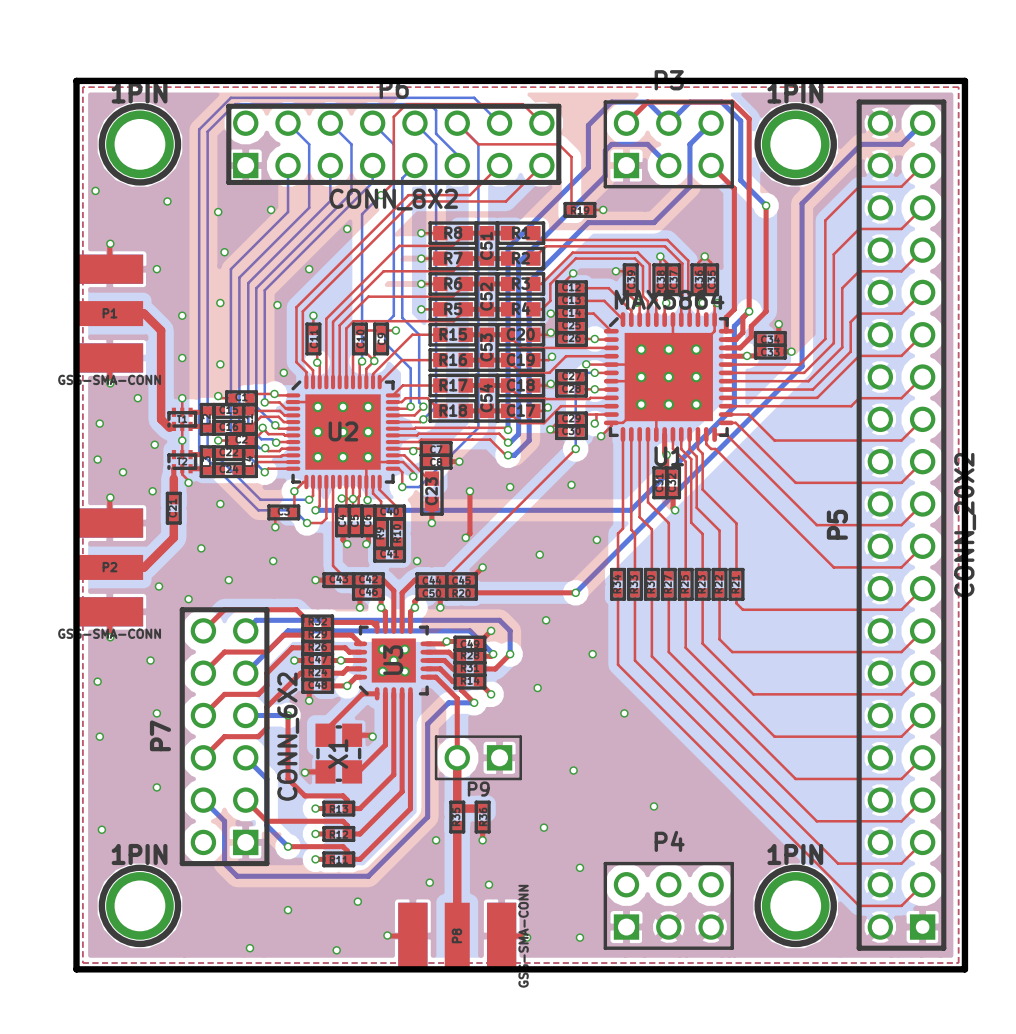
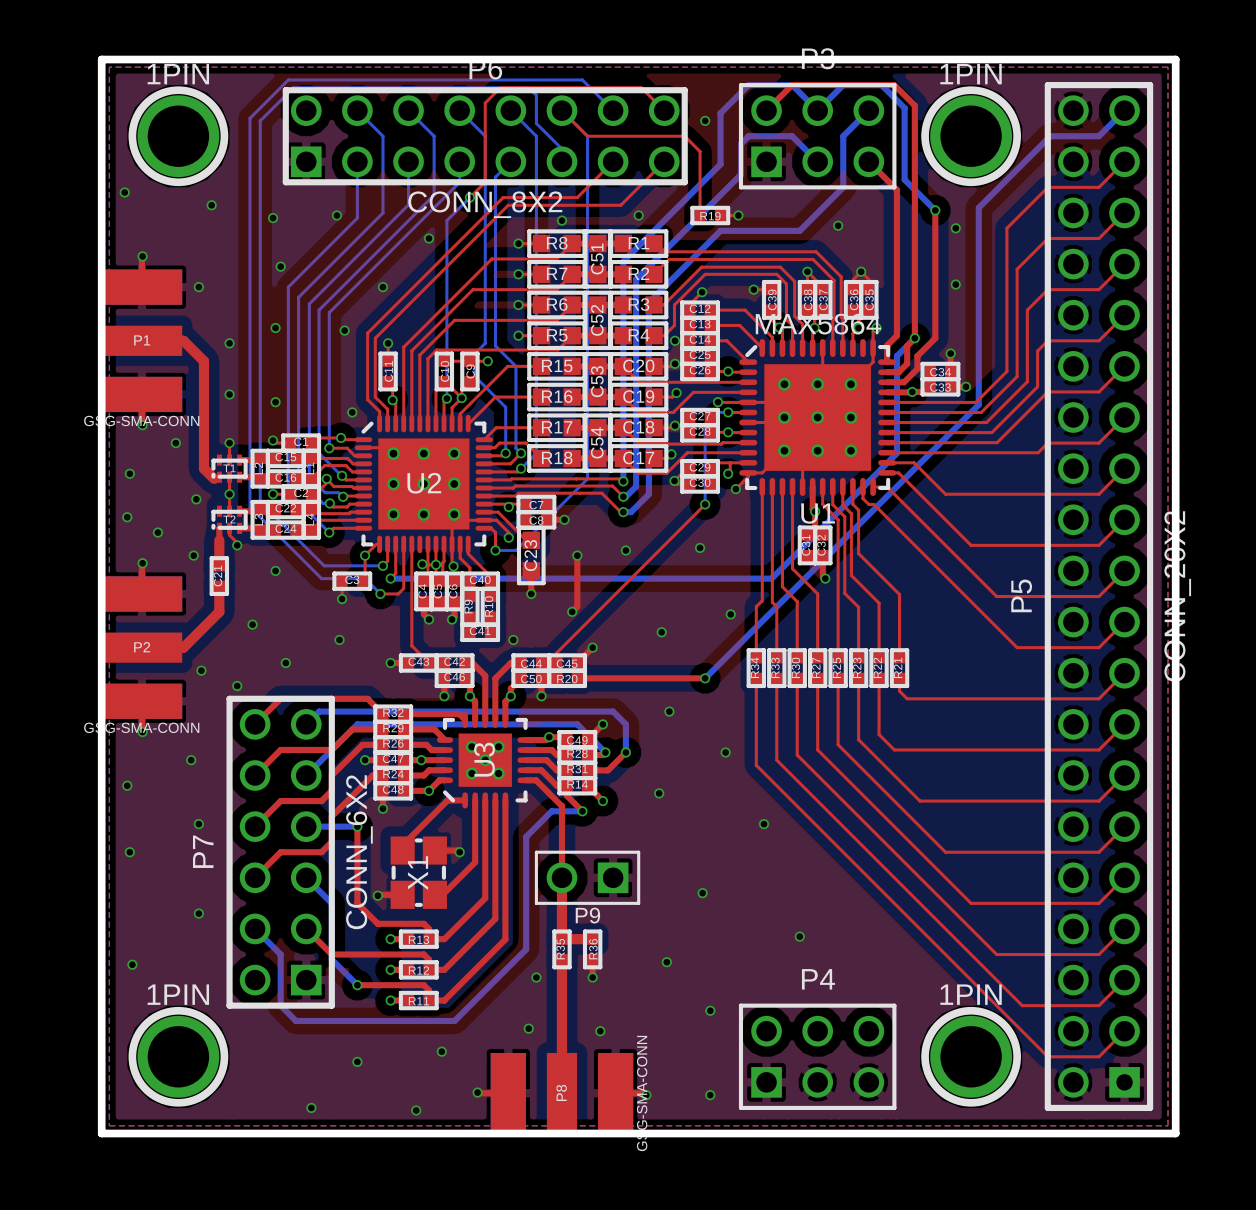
via: none -> (705, 120)
via: none -> (638, 215)
via: none -> (561, 220)
via: none -> (838, 225)
via: none -> (955, 228)
via: none -> (955, 284)

